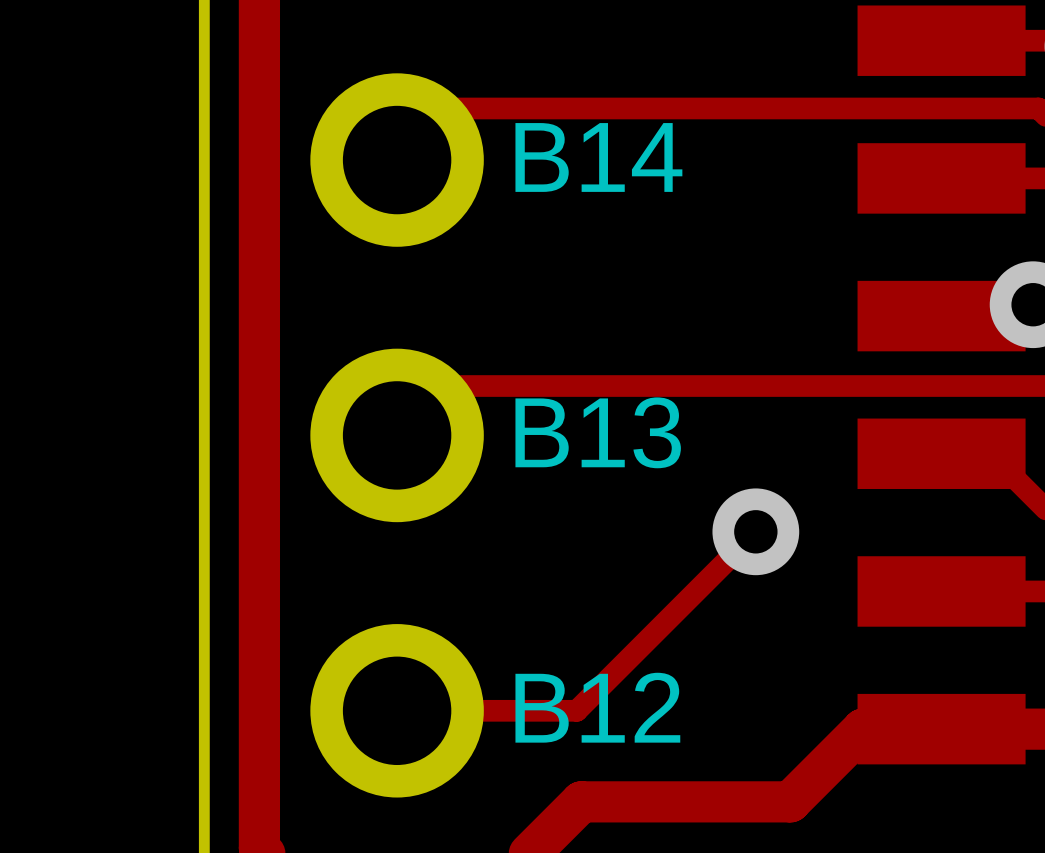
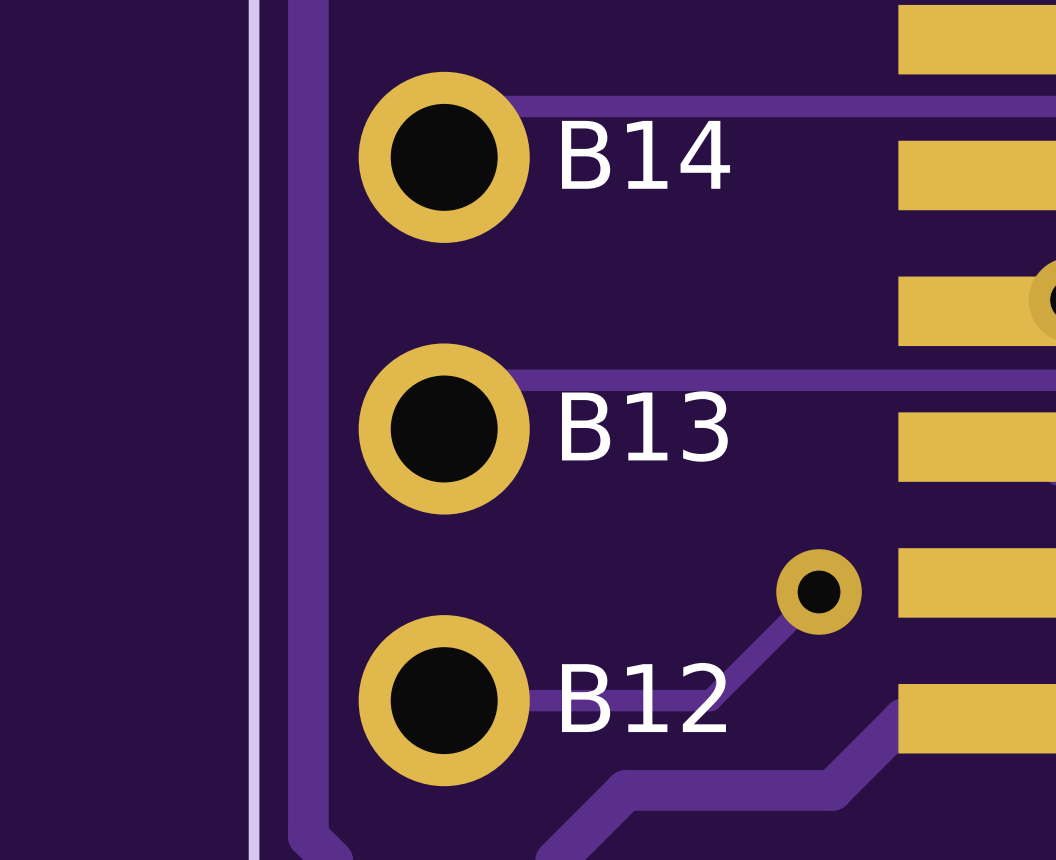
track: (755, 531) (576, 710) -> (819, 591) (710, 700) (621, 700)
via position: (755, 531) -> (819, 591)

